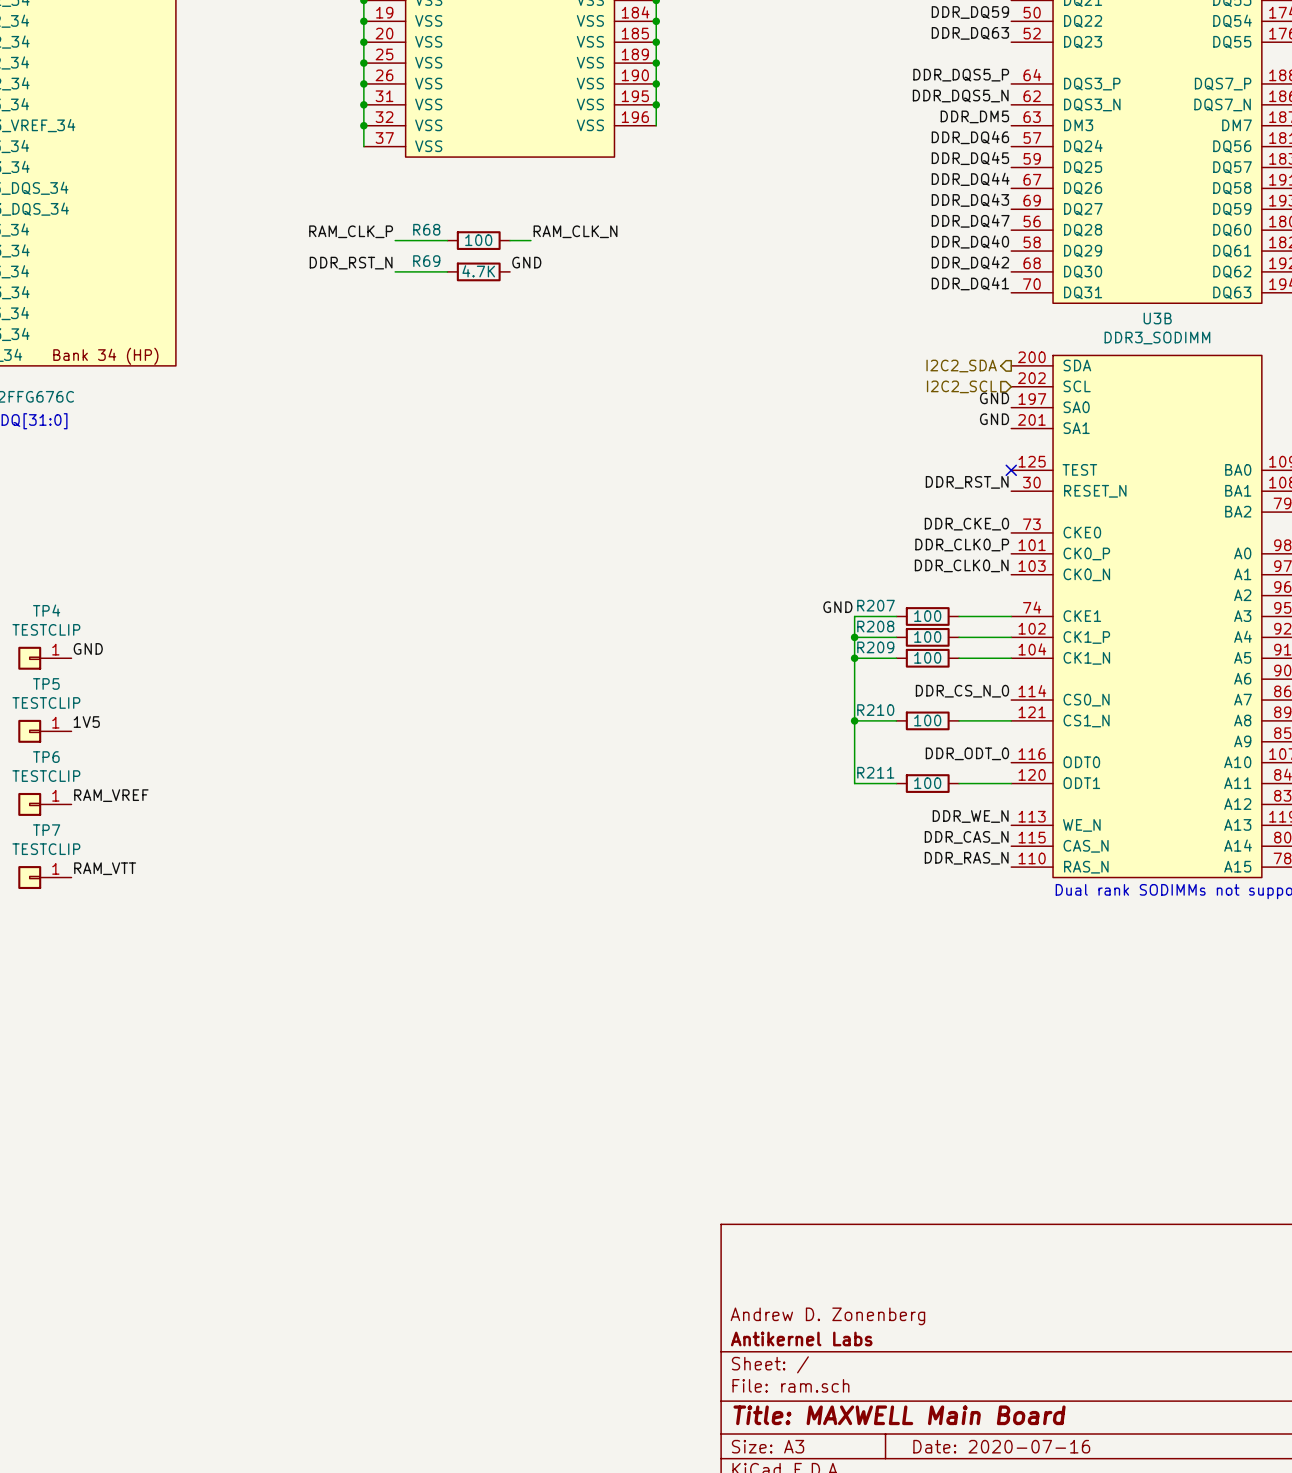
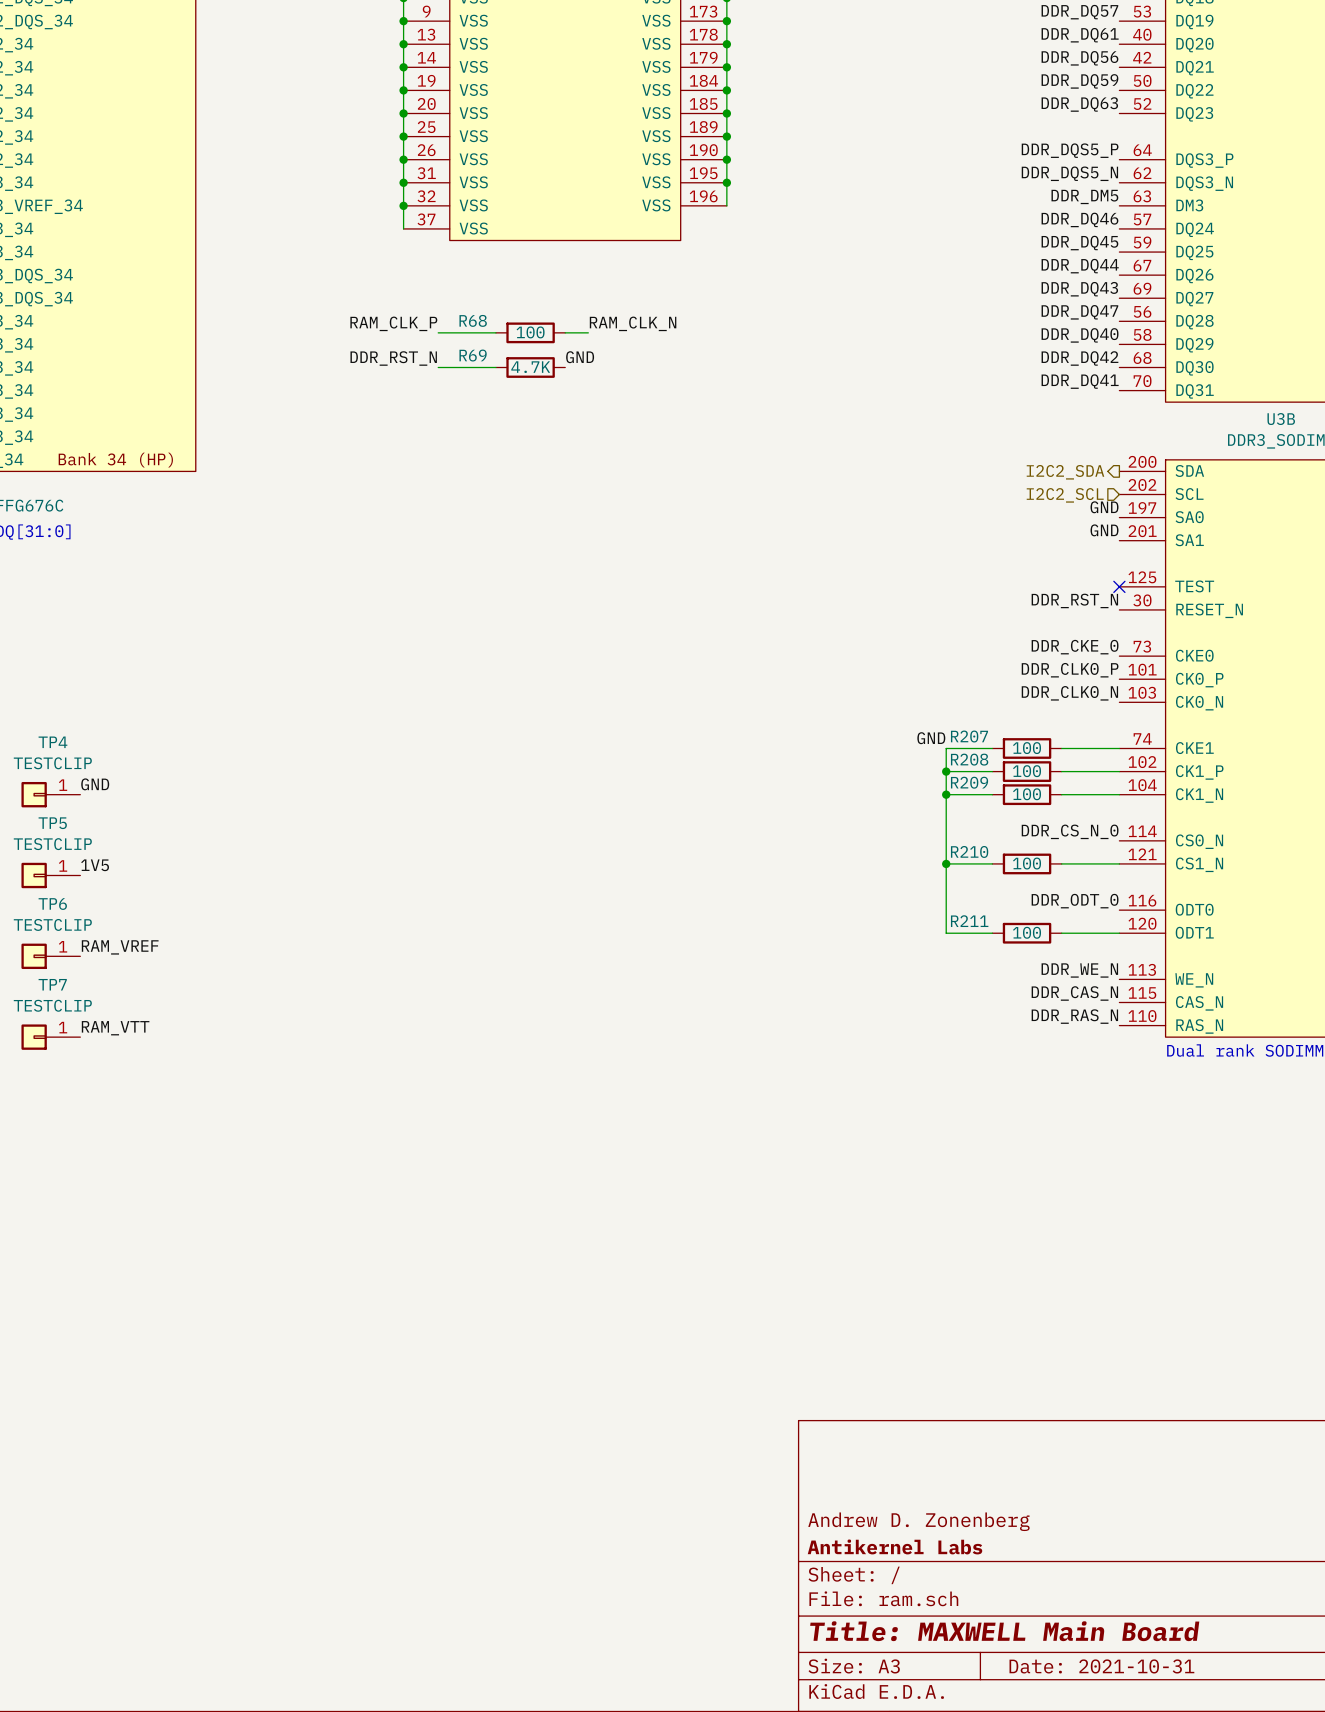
title block: Date: 2020-07-16 (1001, 1446) -> Date: 2021-10-31 (1101, 1666)

